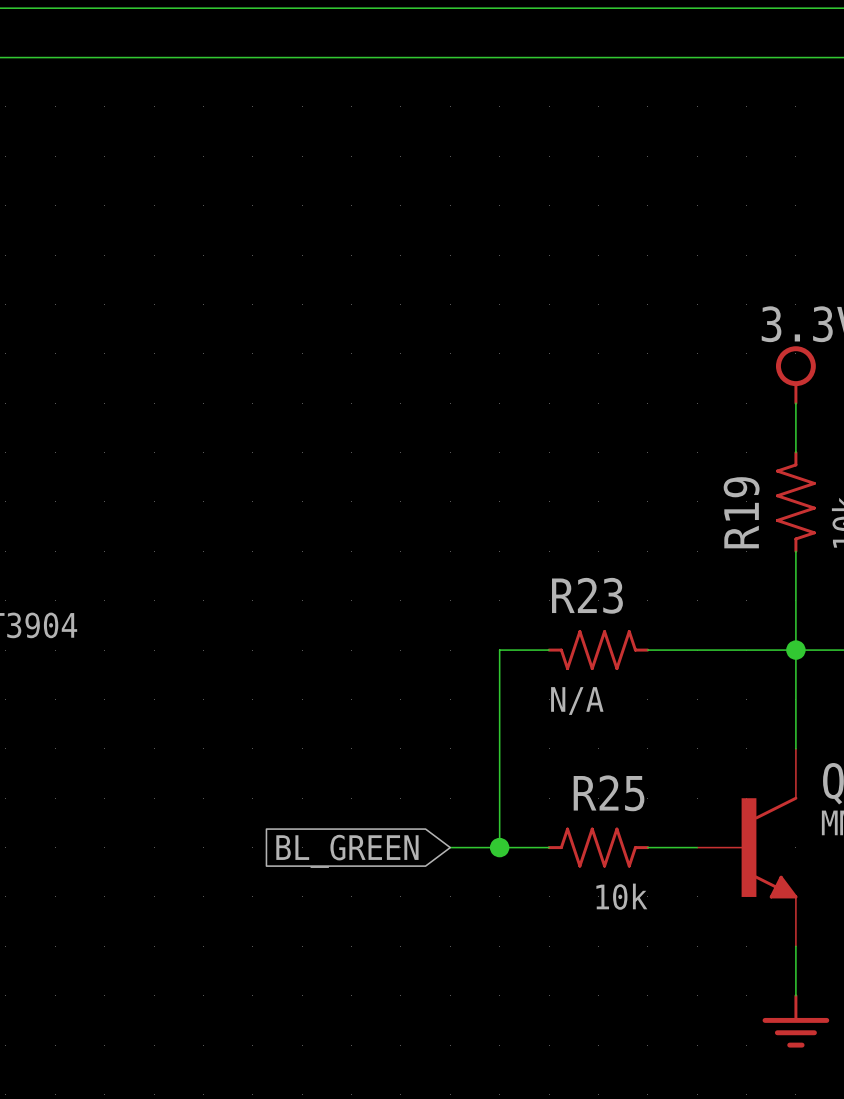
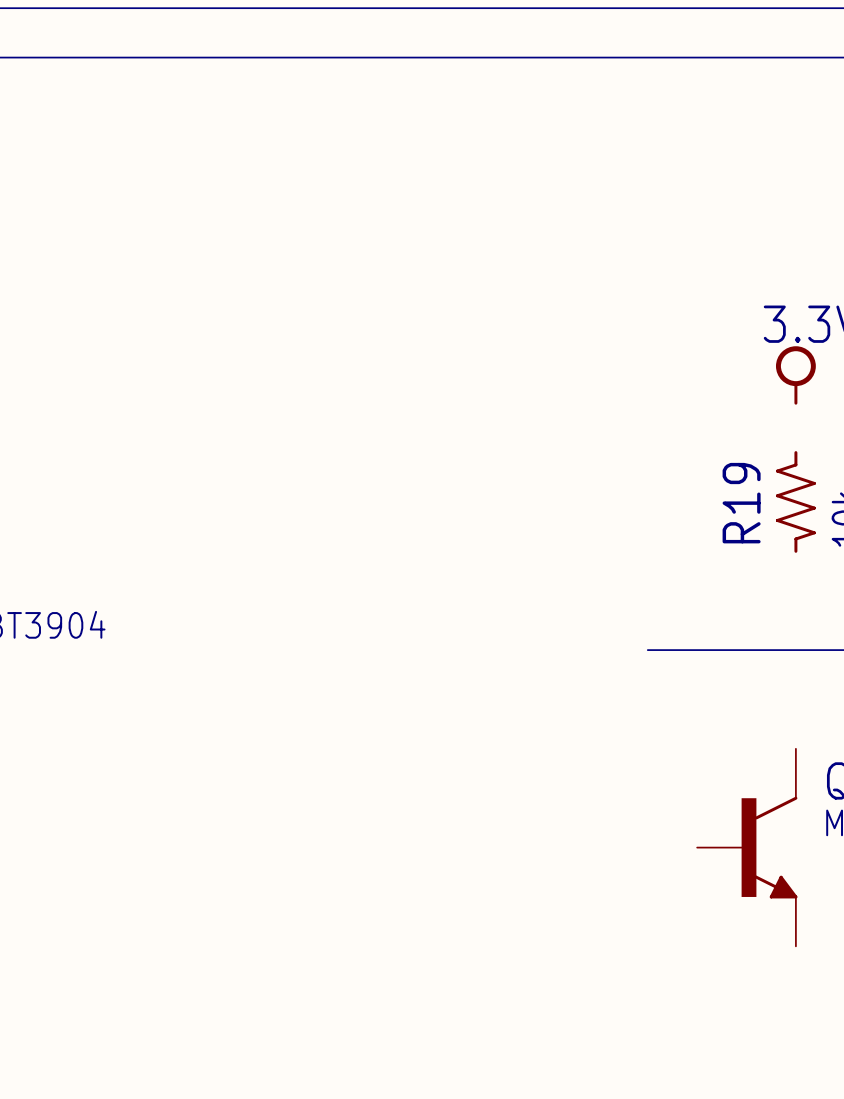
wire: (795, 403) (795, 452) -> none
wire: (795, 551) (795, 748) -> none
wire: (549, 650) (499, 650) (499, 847) -> none
R23: N/A (598, 650) -> none
junction: (795, 650) -> none
wire: (450, 847) (549, 847) -> none
junction: (499, 847) -> none
R25: 10k (598, 847) -> none
wire: (647, 847) (697, 847) -> none
global label: BL_GREEN (347, 851) -> none
wire: (795, 946) (795, 995) -> none
power symbol: (795, 1020) -> none

